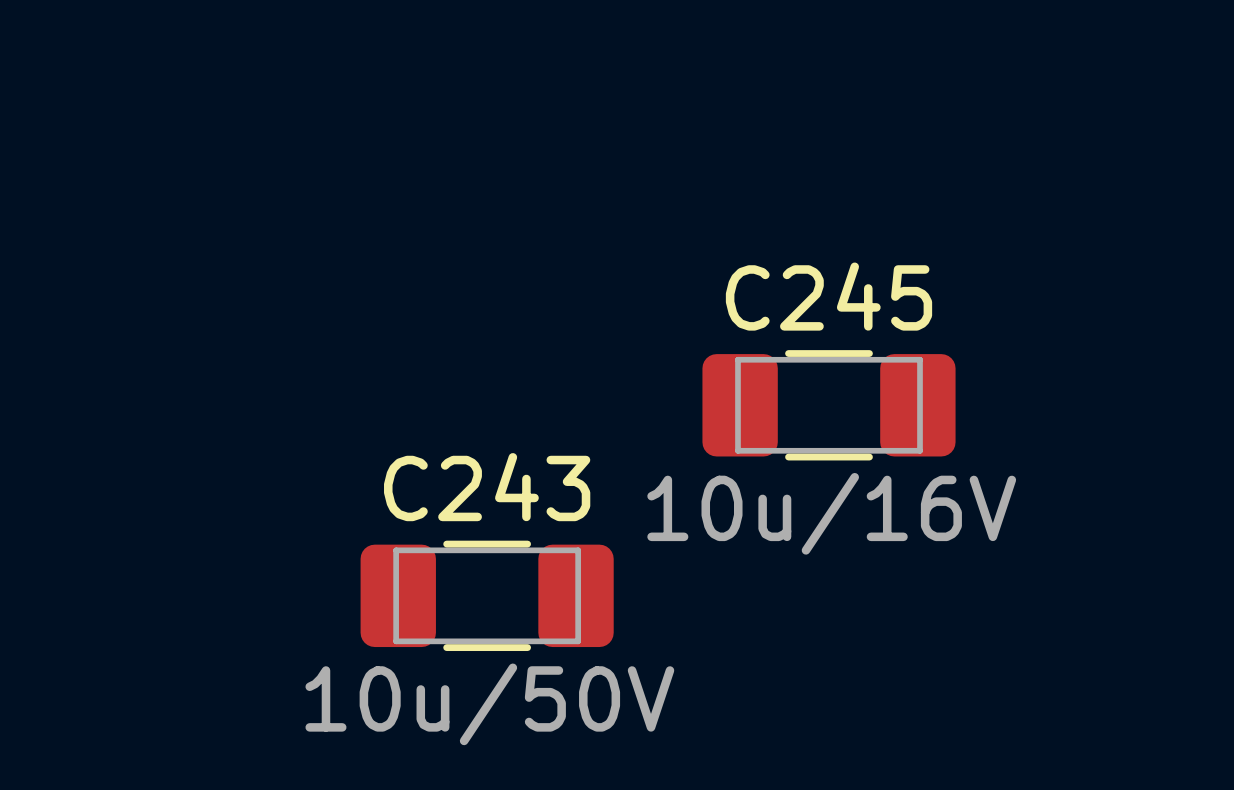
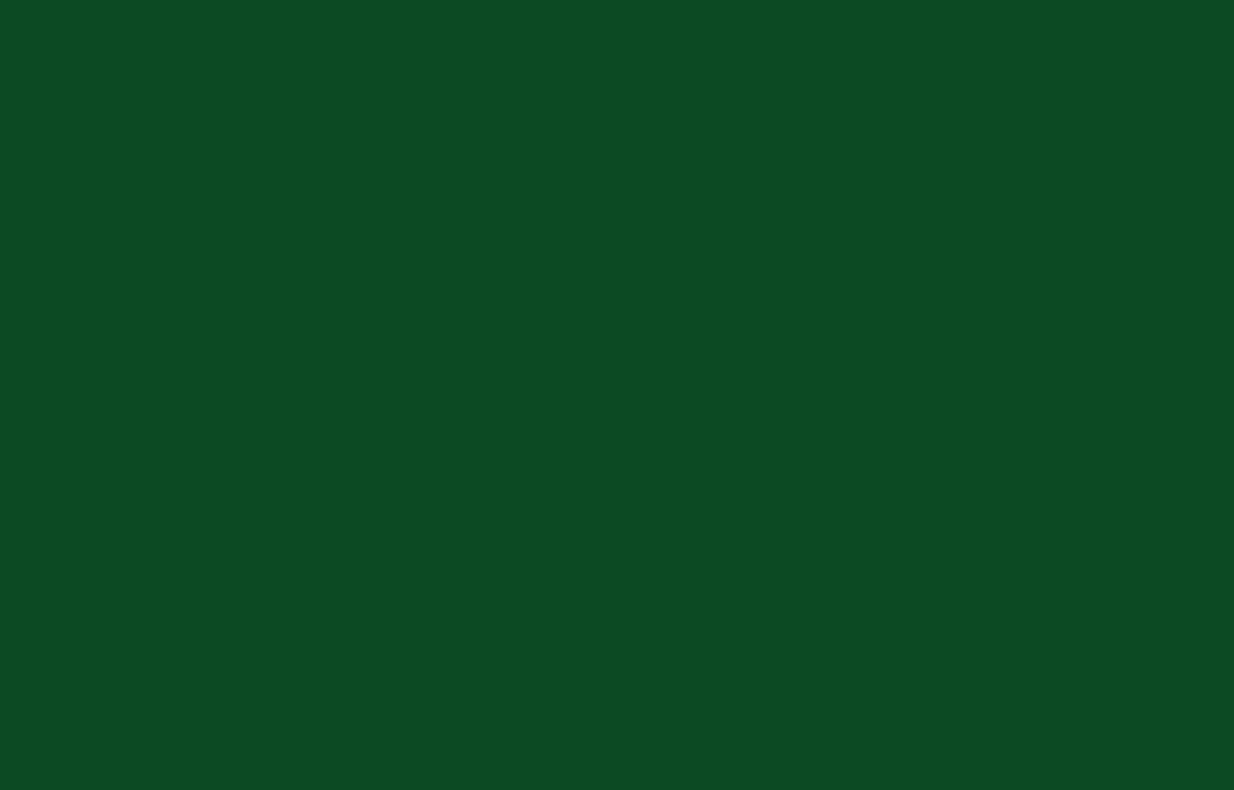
C245: 10u/16V (829, 405) -> none
C243: 10u/50V (487, 595) -> none

